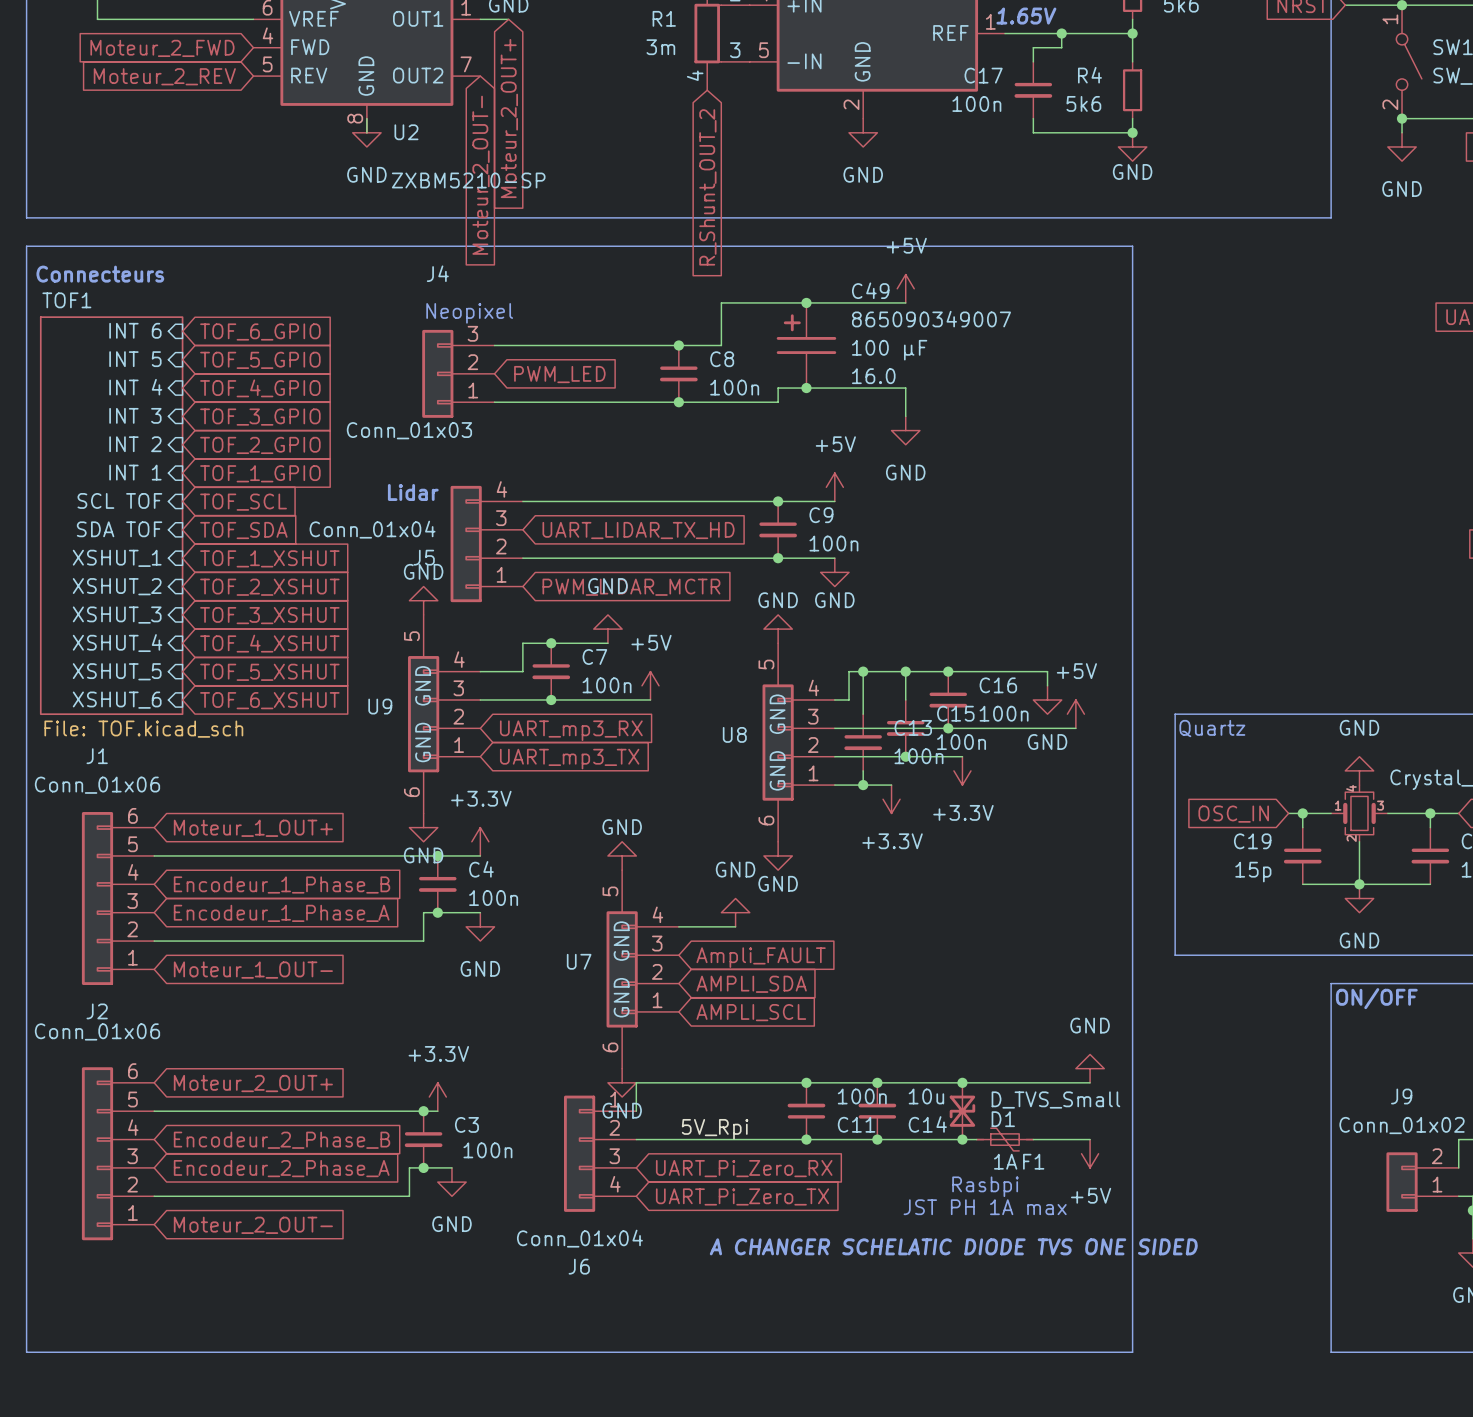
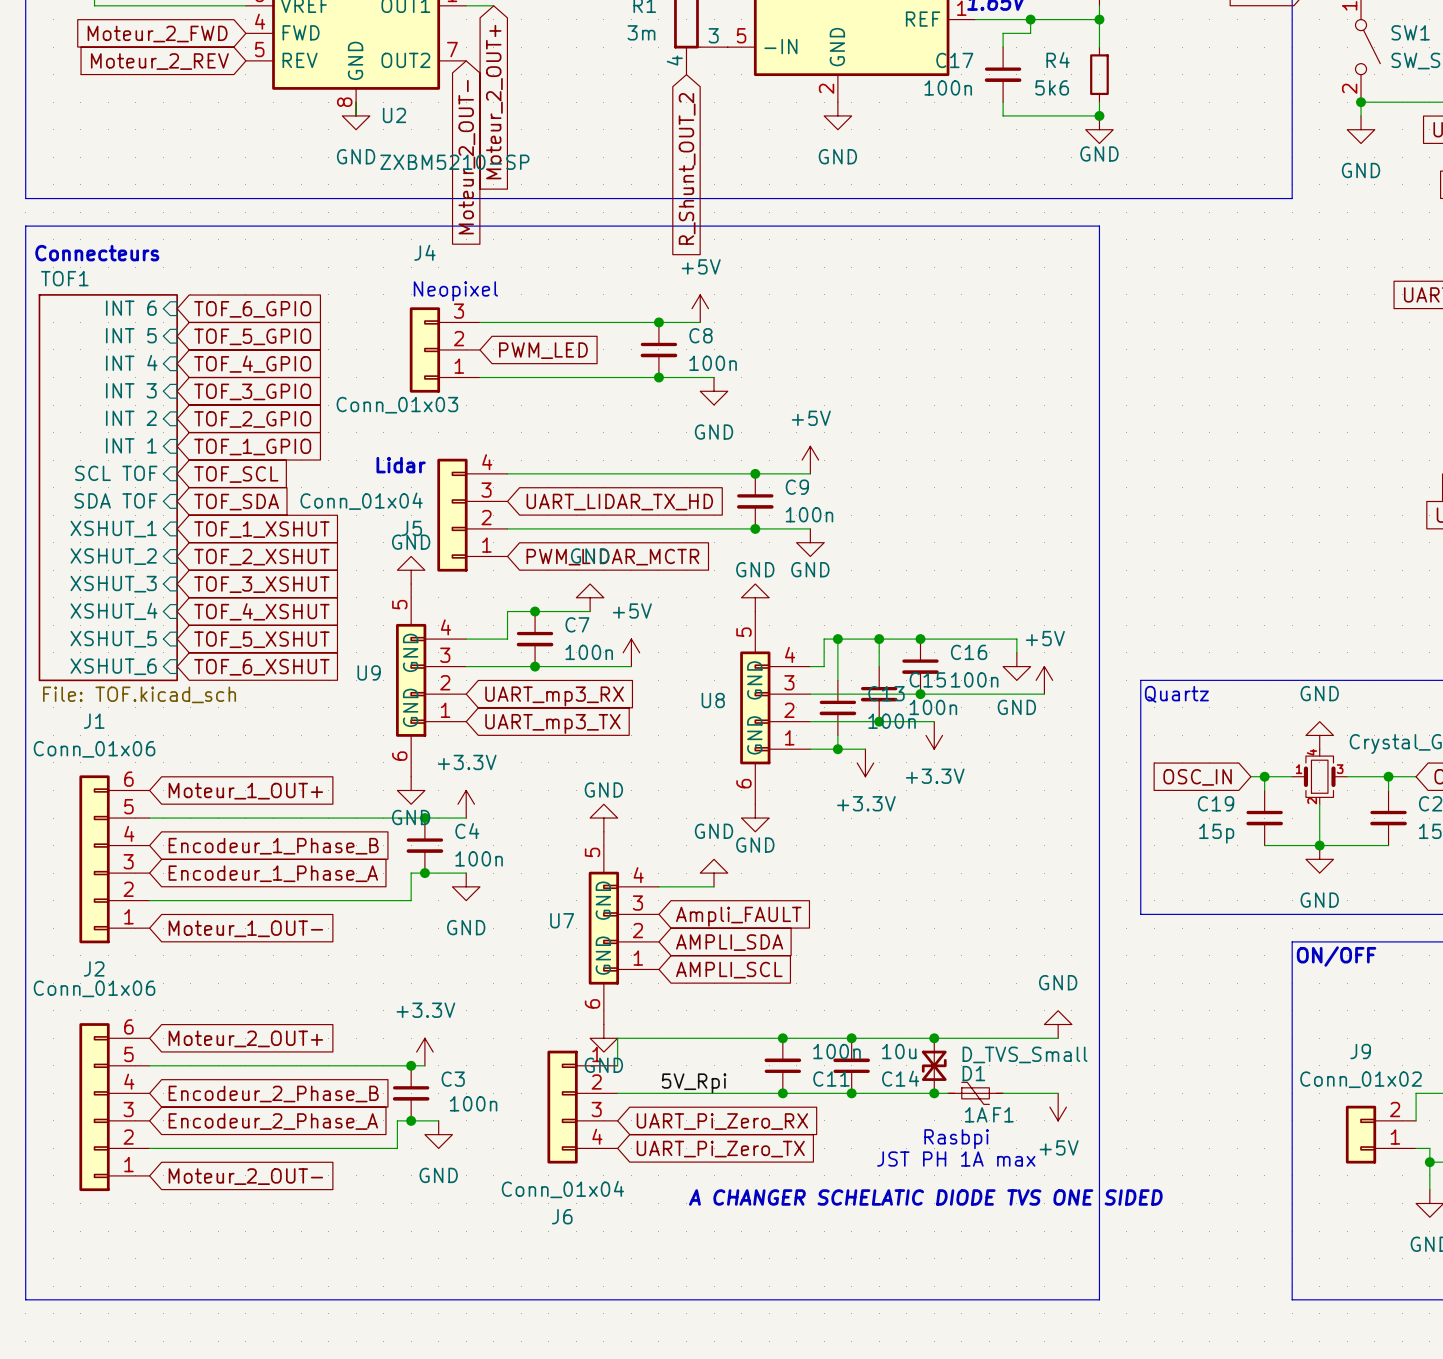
power symbol position: +5V (905, 288) -> +5V (700, 308)
junction: (806, 302) -> none
wire: (905, 302) (721, 302) (721, 345) -> none
C49: (806, 345) -> none
junction: (806, 388) -> none
wire: (735, 402) (778, 402) (778, 388) (905, 388) (905, 416) -> none
power symbol position: GND (905, 430) -> GND (714, 391)

